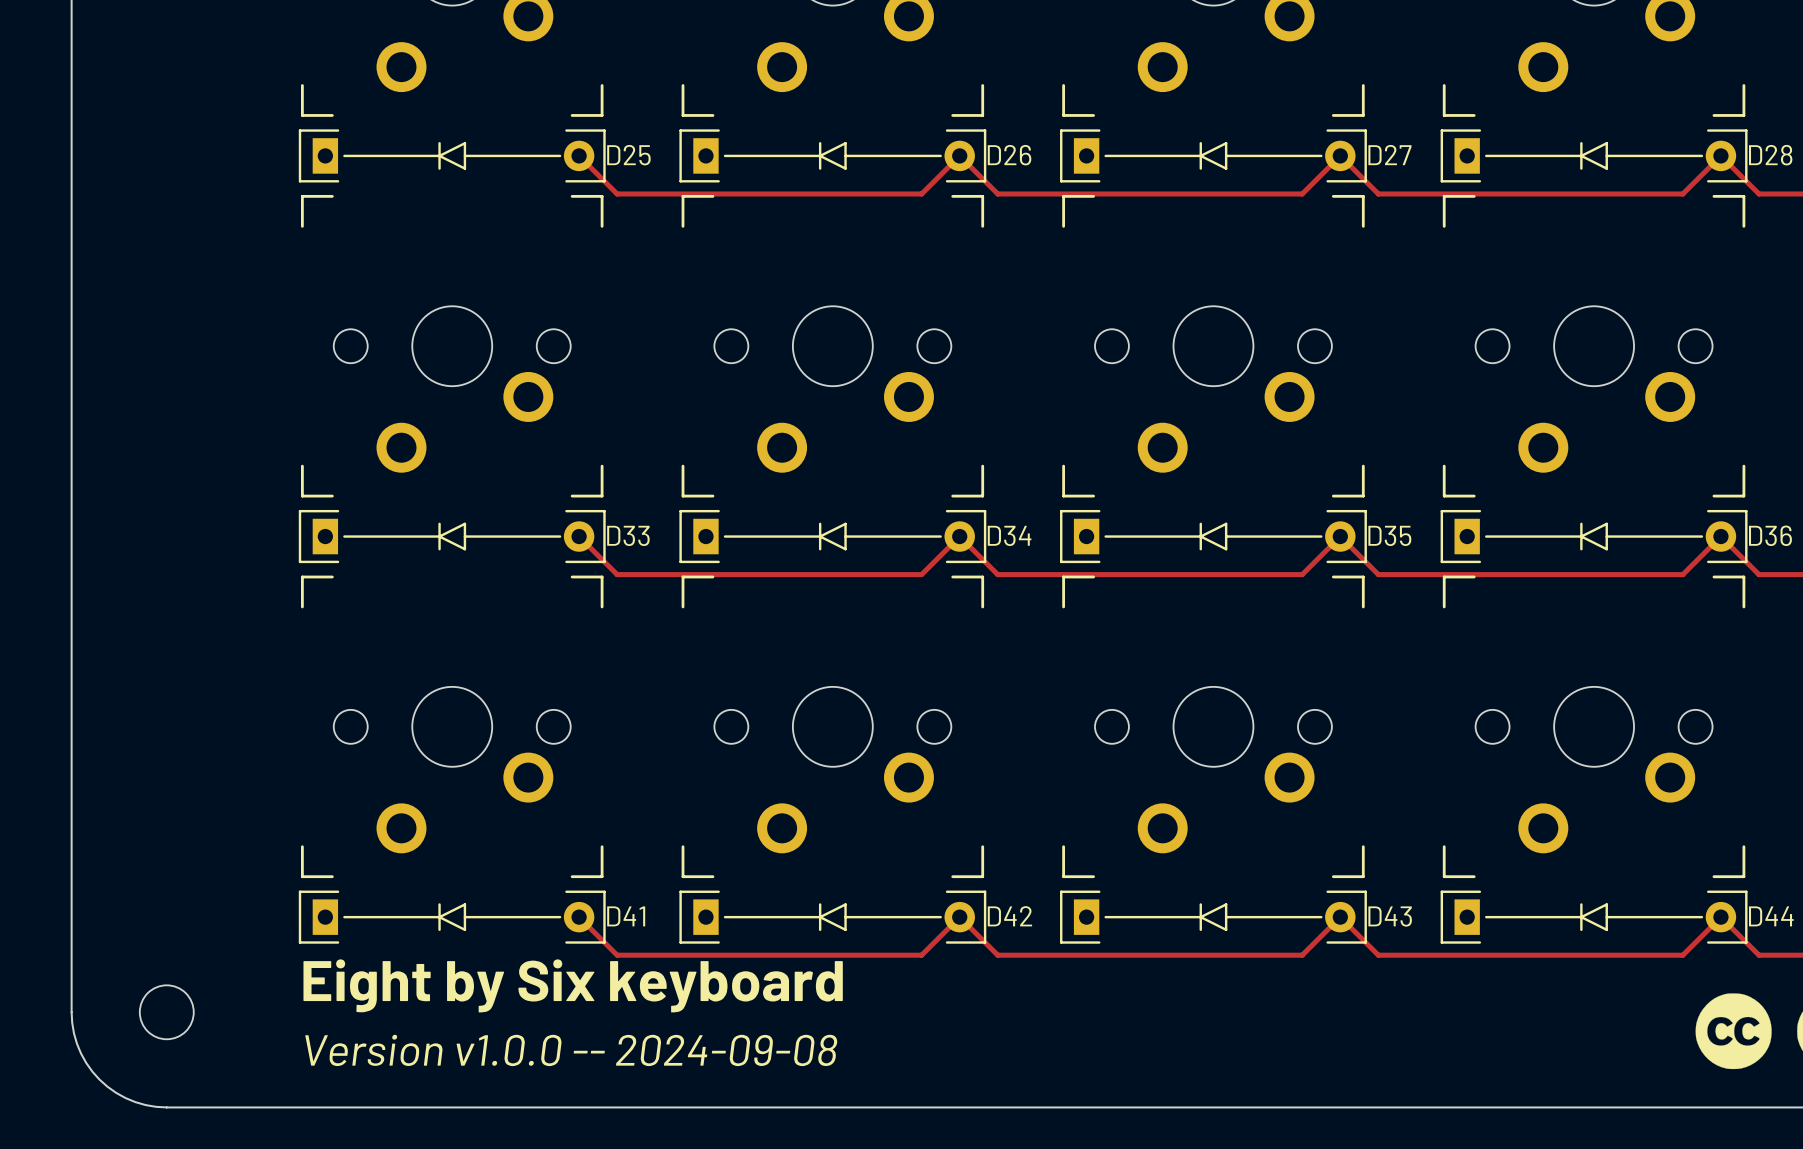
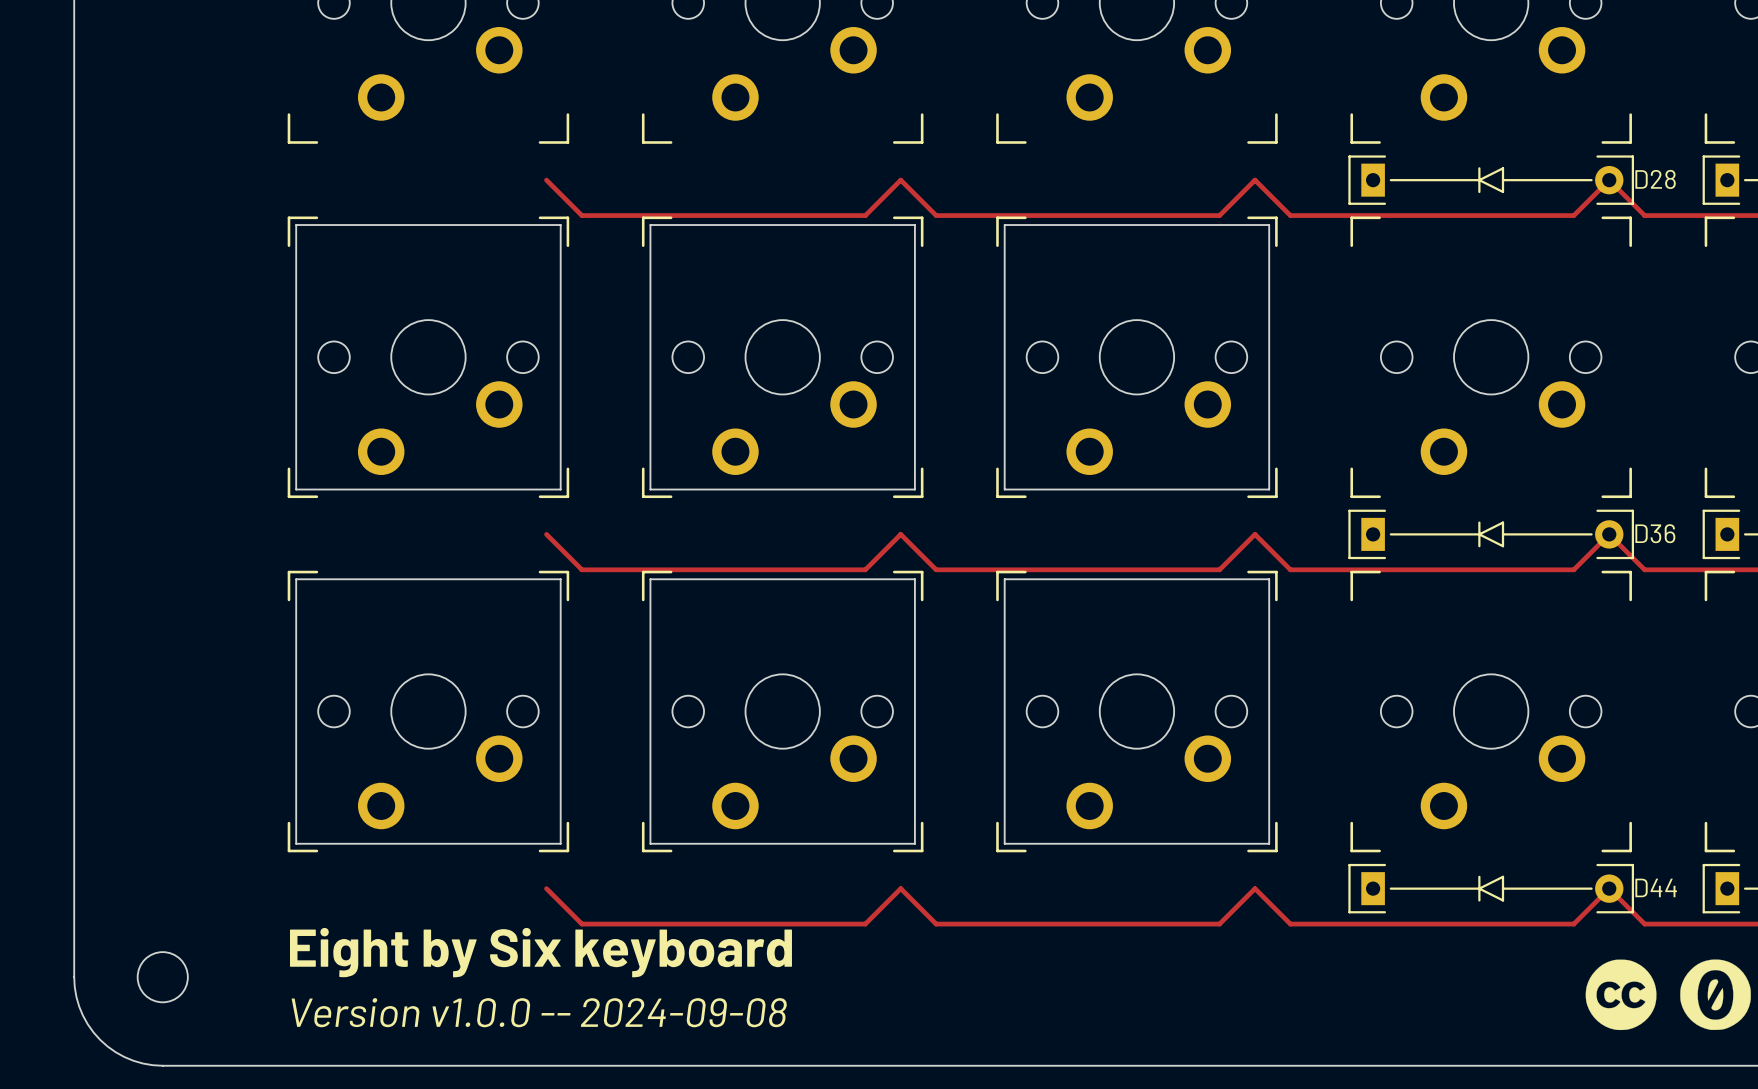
D25: (452, 155) -> none
D26: (832, 155) -> none
D27: (1213, 155) -> none
board edge: none -> (296, 225) (560, 225) (560, 489) (296, 489) (296, 225)
board edge: none -> (650, 225) (914, 225) (914, 489) (650, 489) (650, 225)
board edge: none -> (1004, 225) (1269, 225) (1269, 489) (1004, 489) (1004, 225)
D33: (452, 536) -> none
D34: (832, 536) -> none
D35: (1213, 536) -> none
board edge: none -> (296, 579) (296, 843) (560, 843) (560, 579) (296, 579)
board edge: none -> (650, 579) (650, 843) (914, 843) (914, 579) (650, 579)
board edge: none -> (1004, 579) (1269, 579) (1269, 843) (1004, 843) (1004, 579)
D41: (452, 917) -> none
D42: (832, 917) -> none
D43: (1213, 917) -> none

